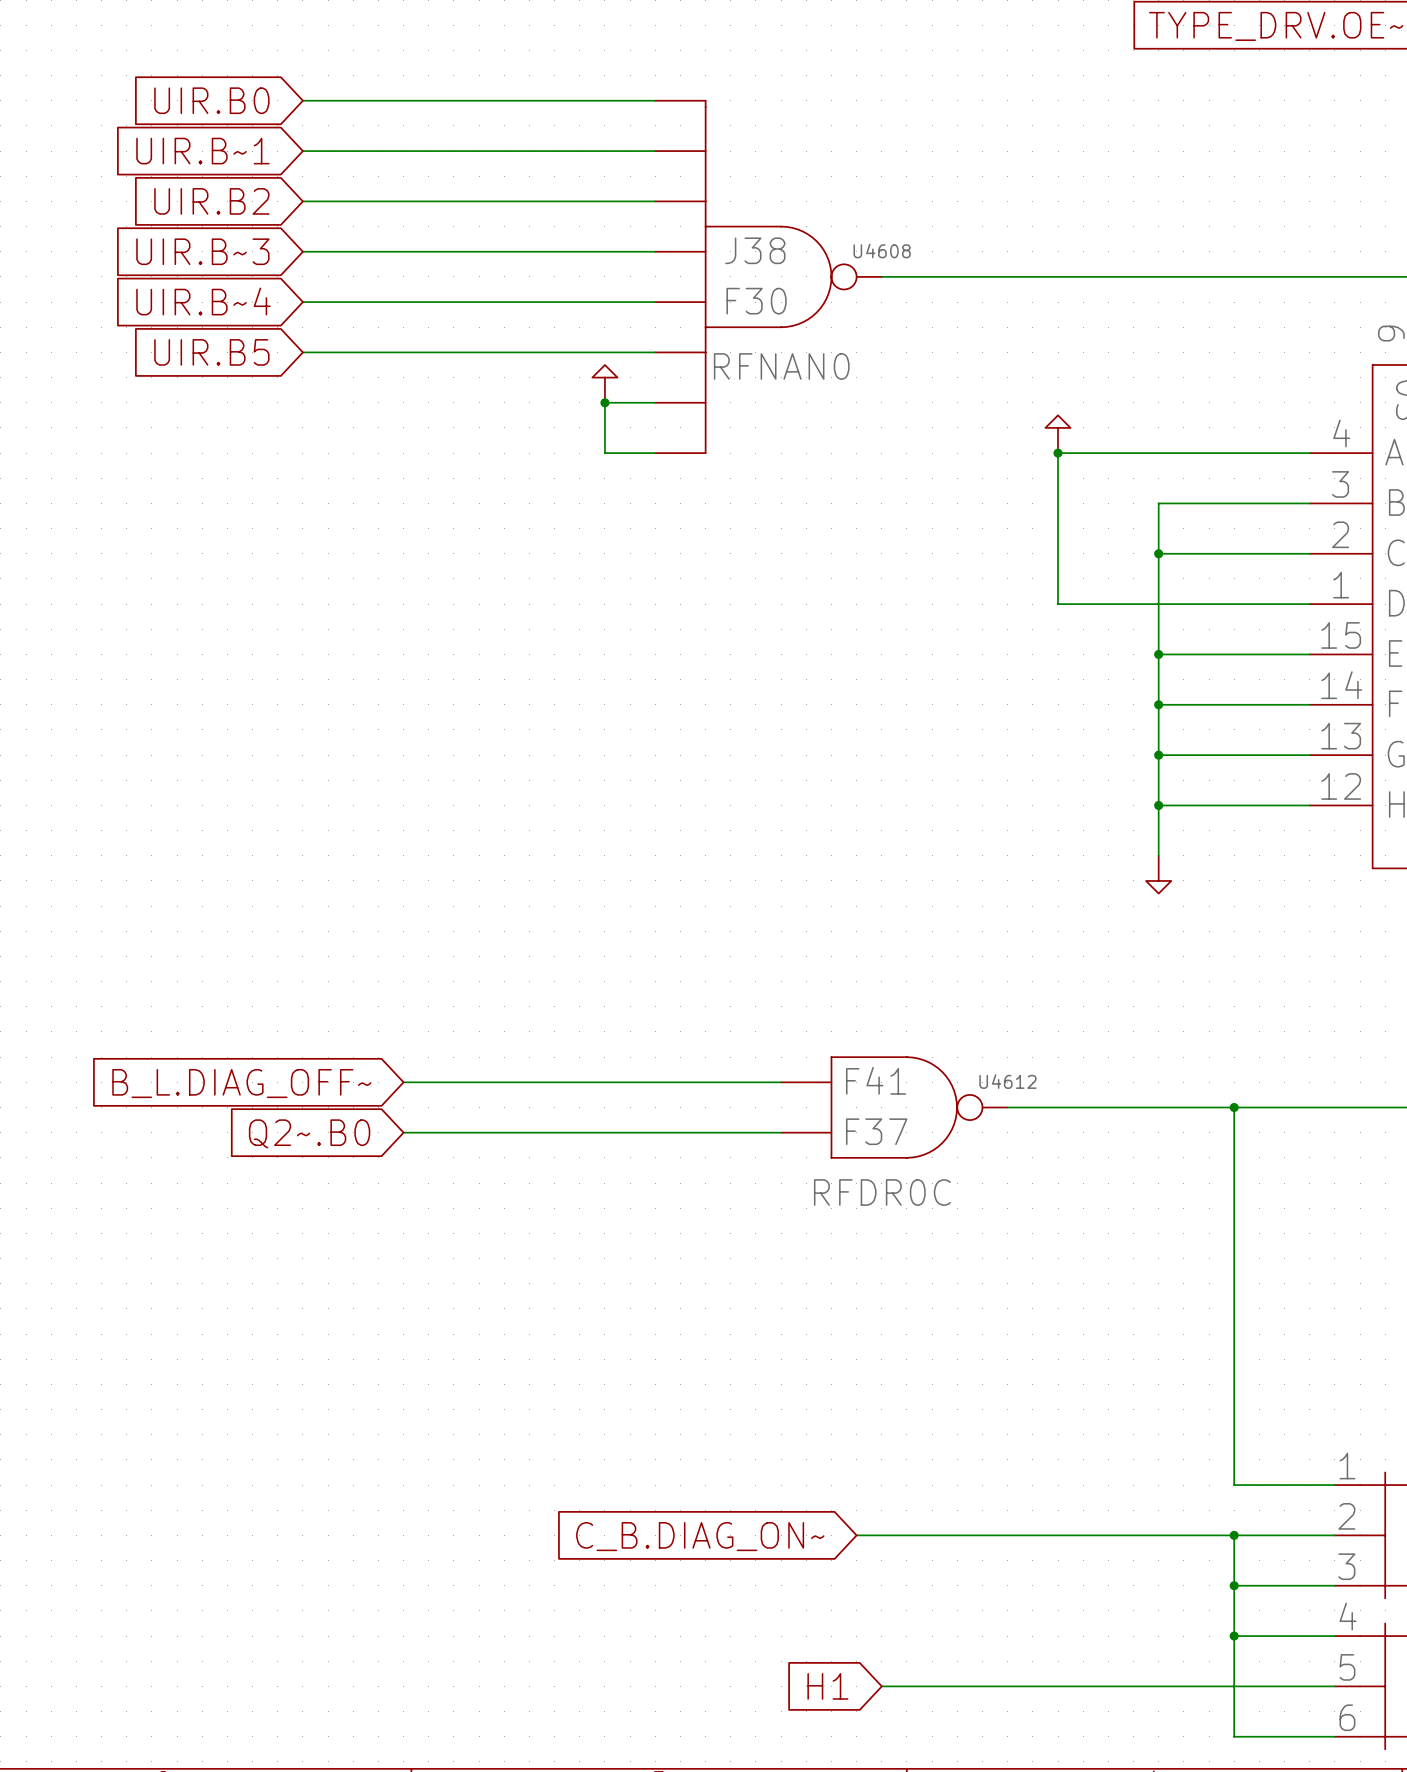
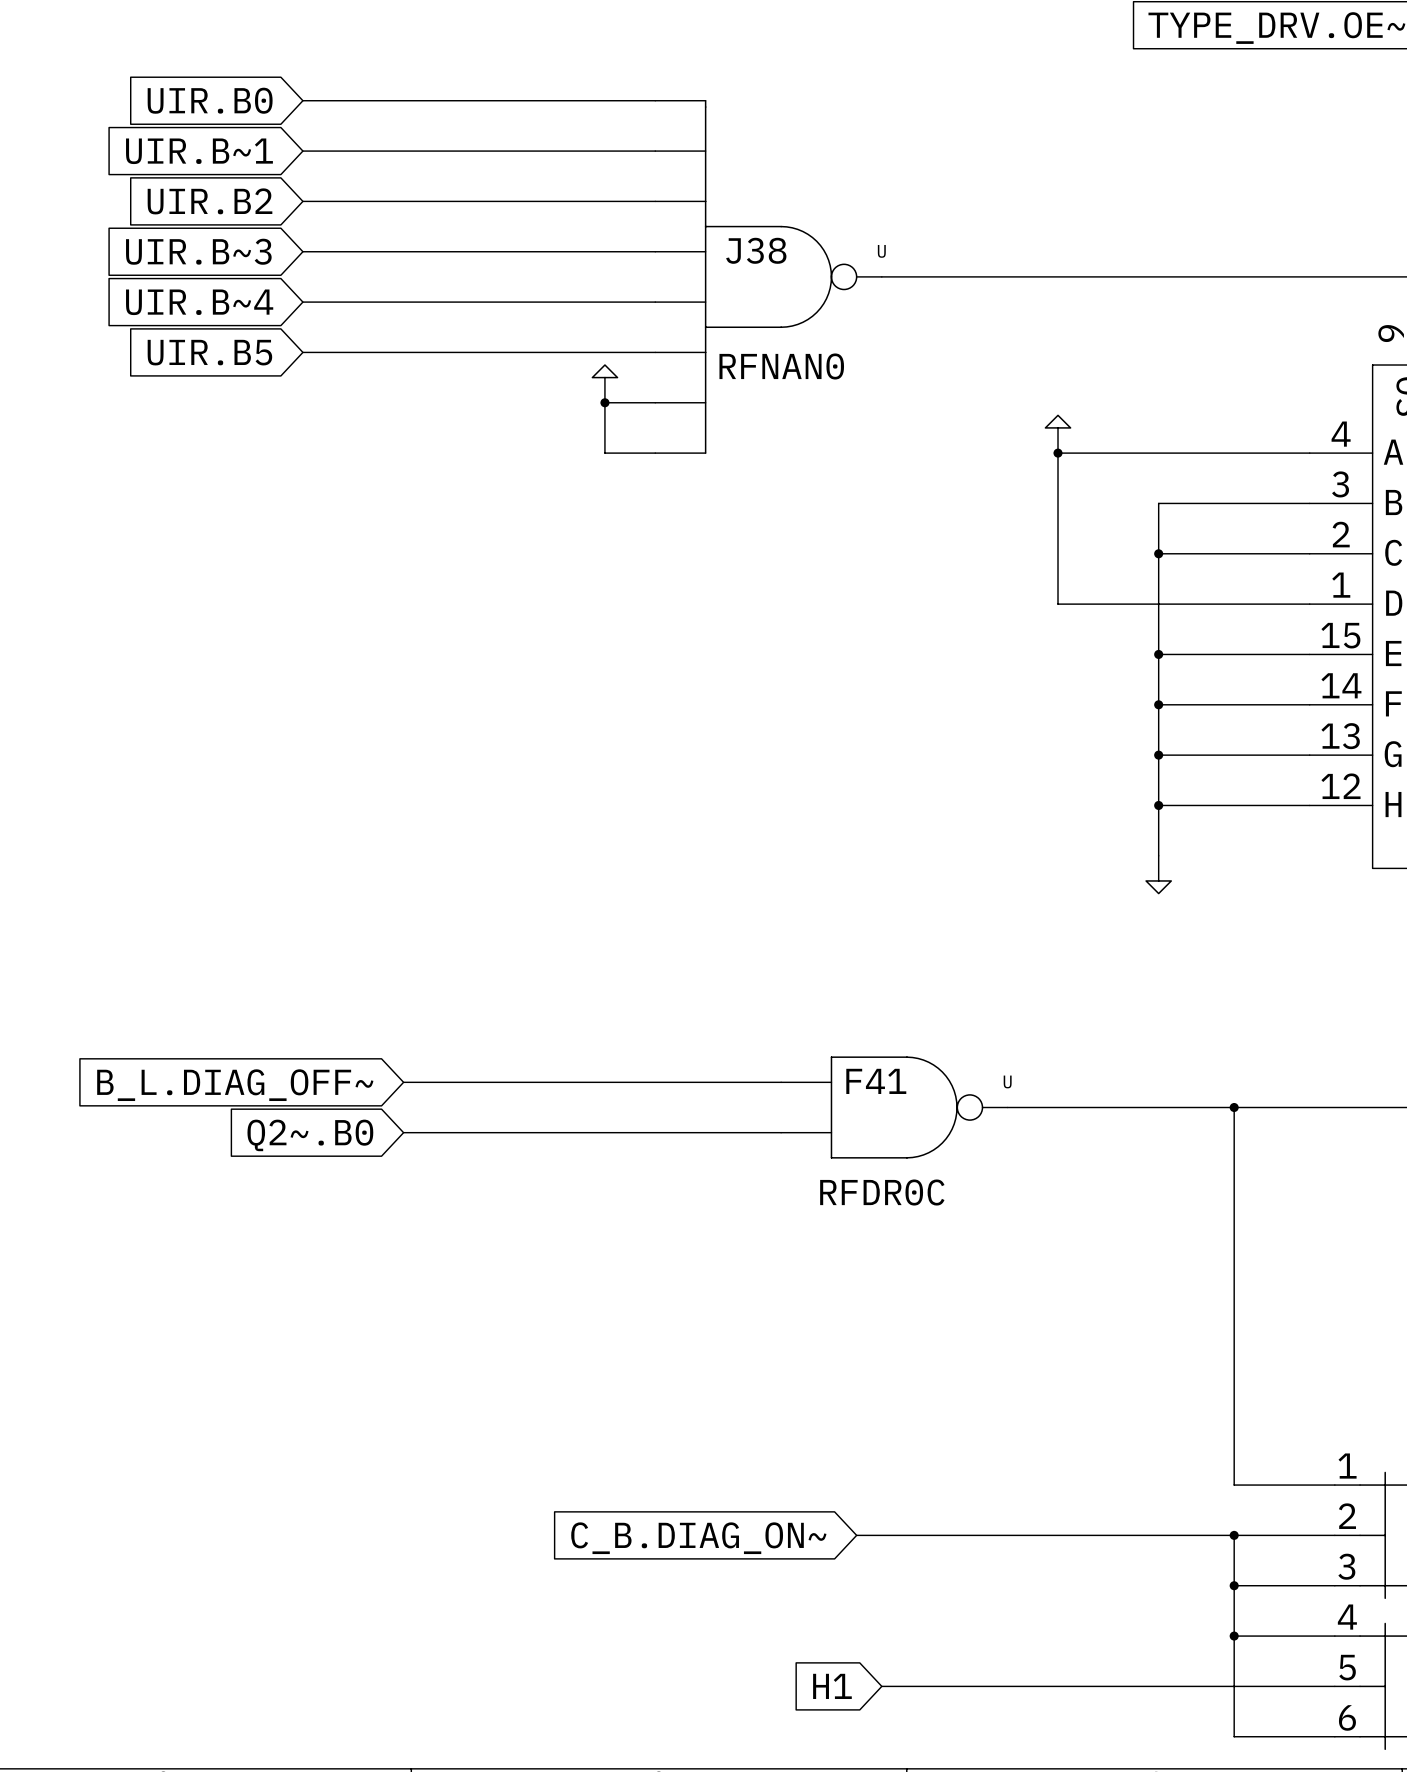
U4608 name: U4608 (882, 250) -> U (881, 251)
U4608 value: F30 (756, 301) -> none
U4612 name: U4612 (1007, 1081) -> U (1007, 1081)
U4612 value: F37 (876, 1131) -> none

